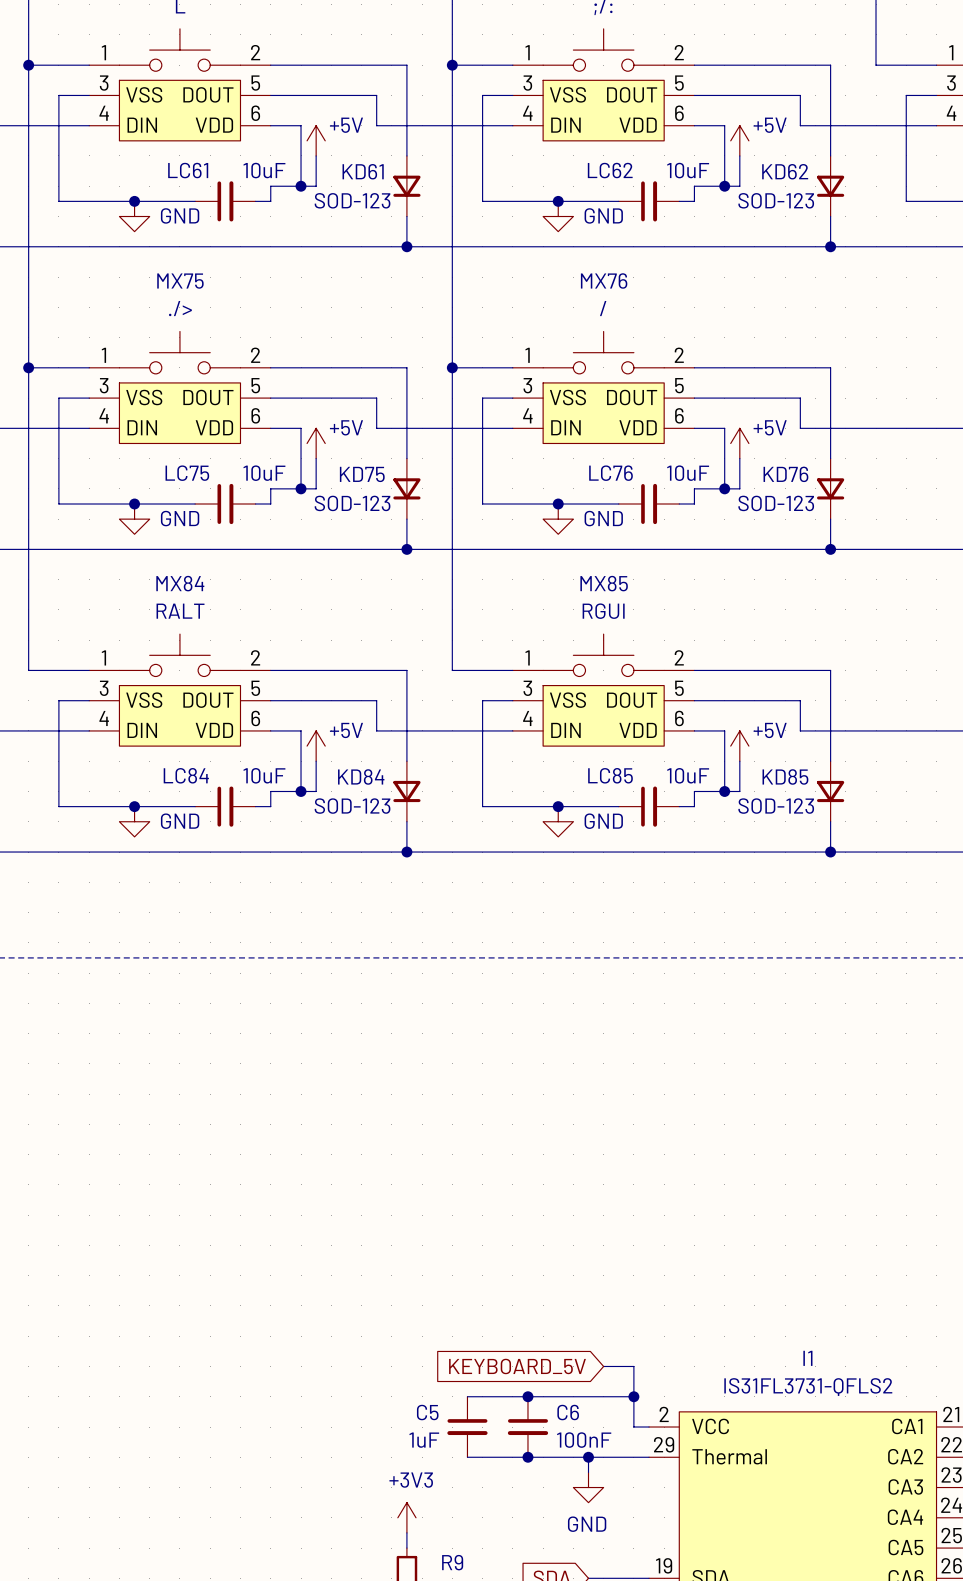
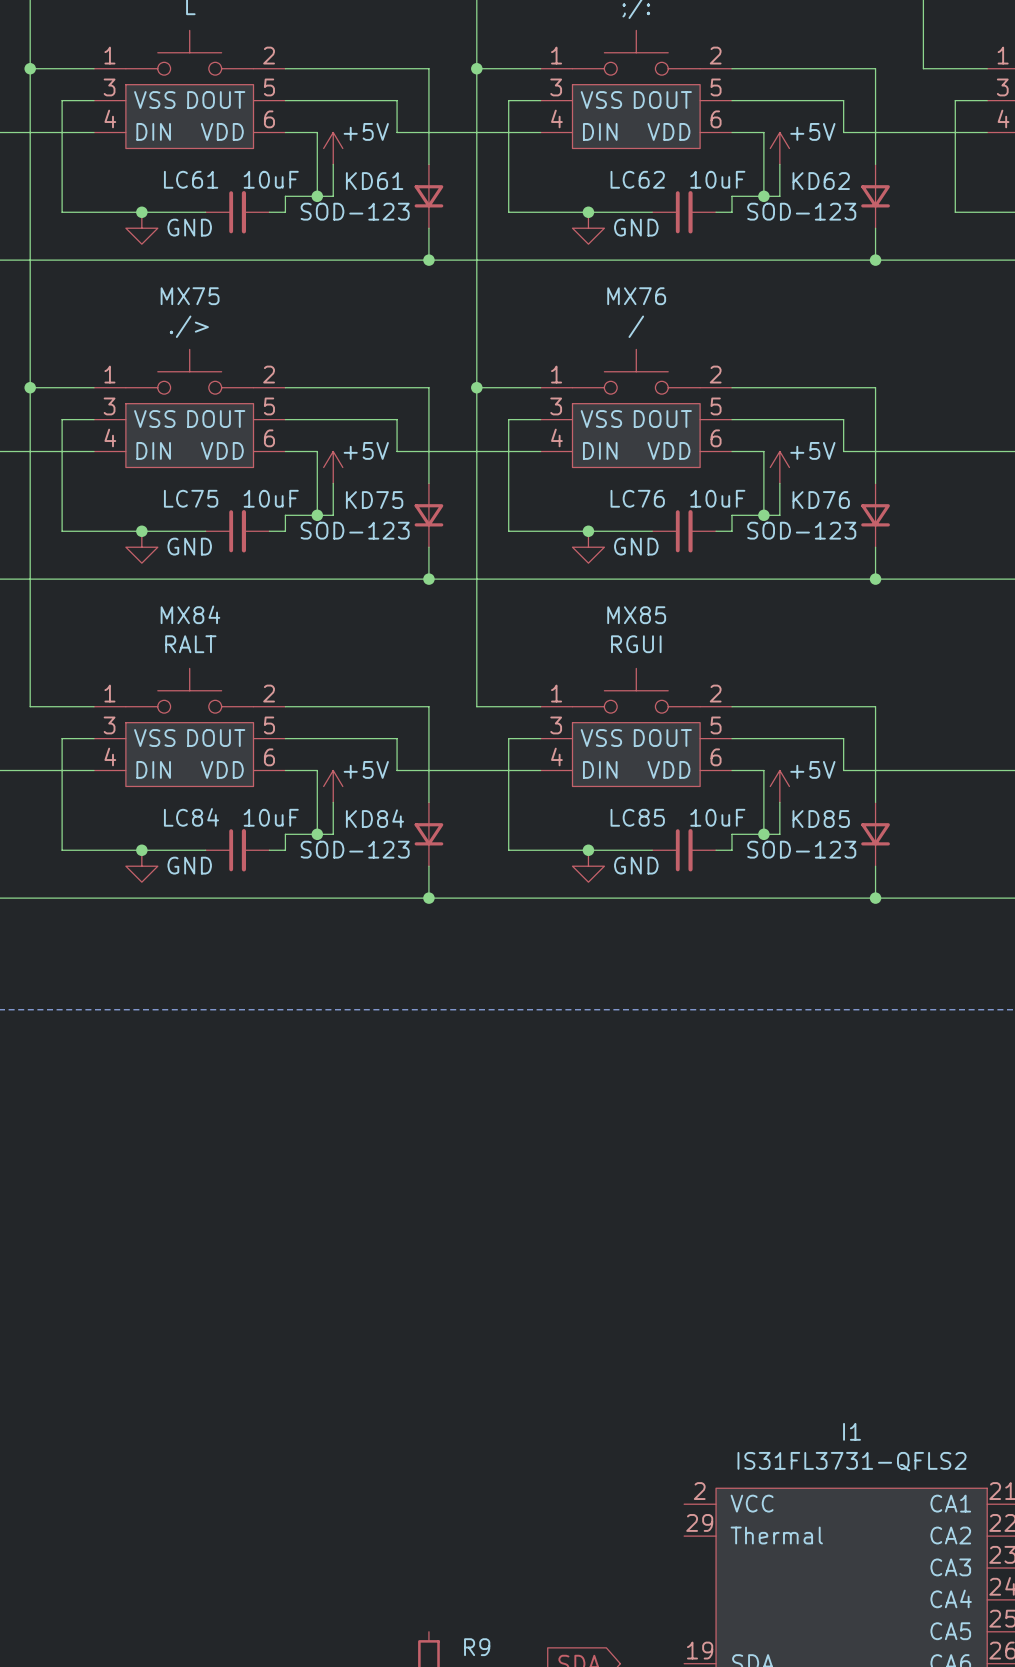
global label: KEYBOARD_5V (517, 1366) -> none
wire: (603, 1366) (633, 1366) (633, 1427) (649, 1427) -> none
wire: (467, 1396) (633, 1396) -> none
junction: (527, 1396) -> none
junction: (633, 1396) -> none
C5: 1uF (467, 1427) -> none
C6: 100nF (527, 1427) -> none
wire: (467, 1457) (649, 1457) -> none
junction: (527, 1457) -> none
wire: (588, 1457) (588, 1472) -> none
junction: (588, 1457) -> none
power symbol: GND (588, 1487) -> none
power symbol: +3V3 (406, 1517) -> none
wire: (406, 1532) (406, 1548) -> none
wire: (588, 1578) (649, 1578) -> none

